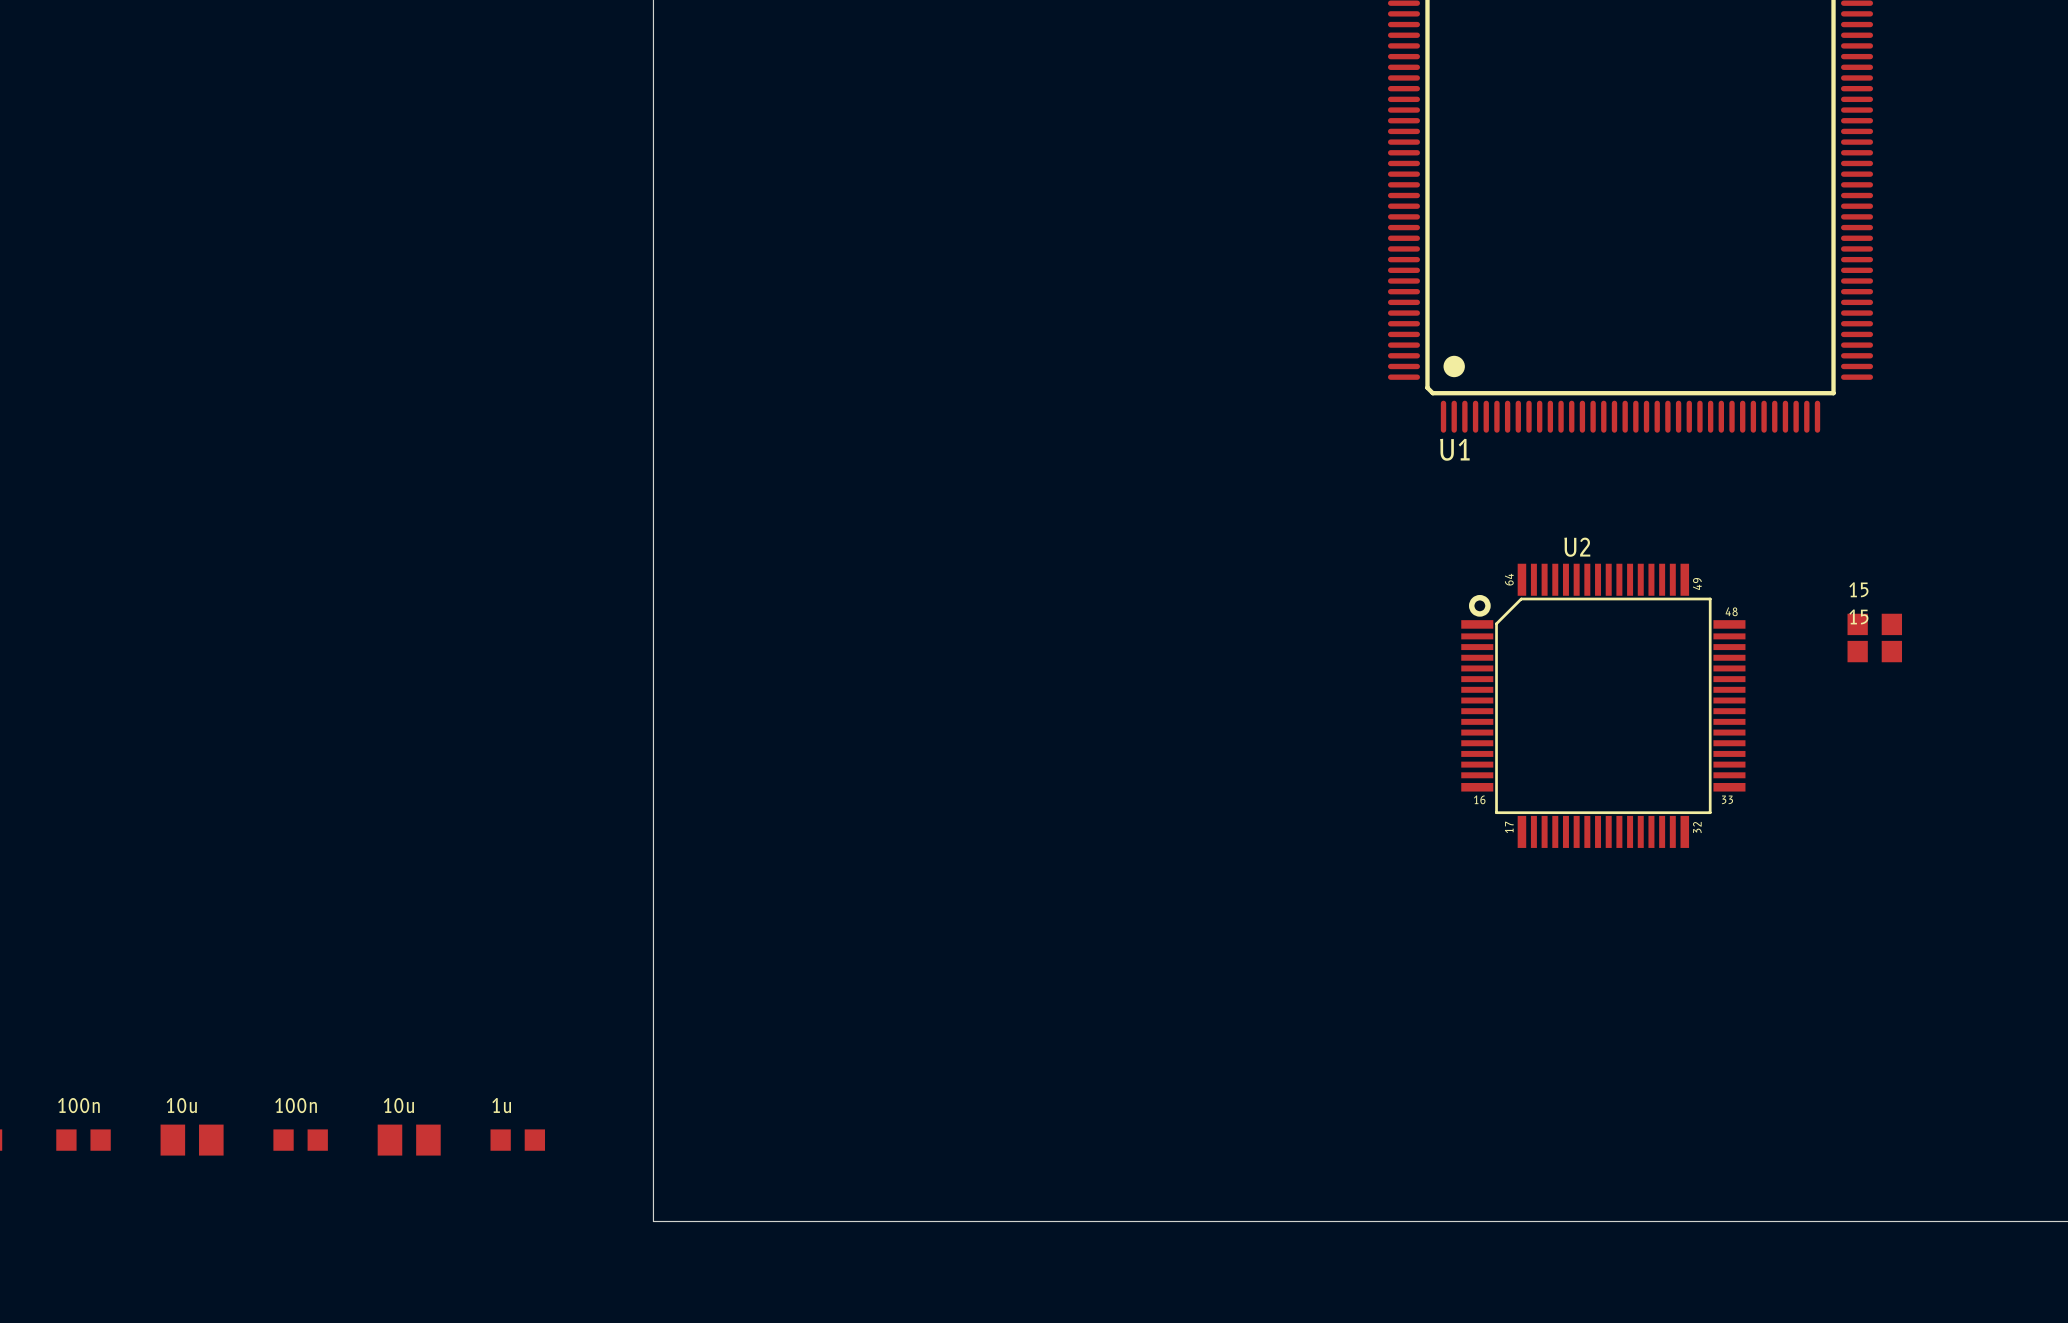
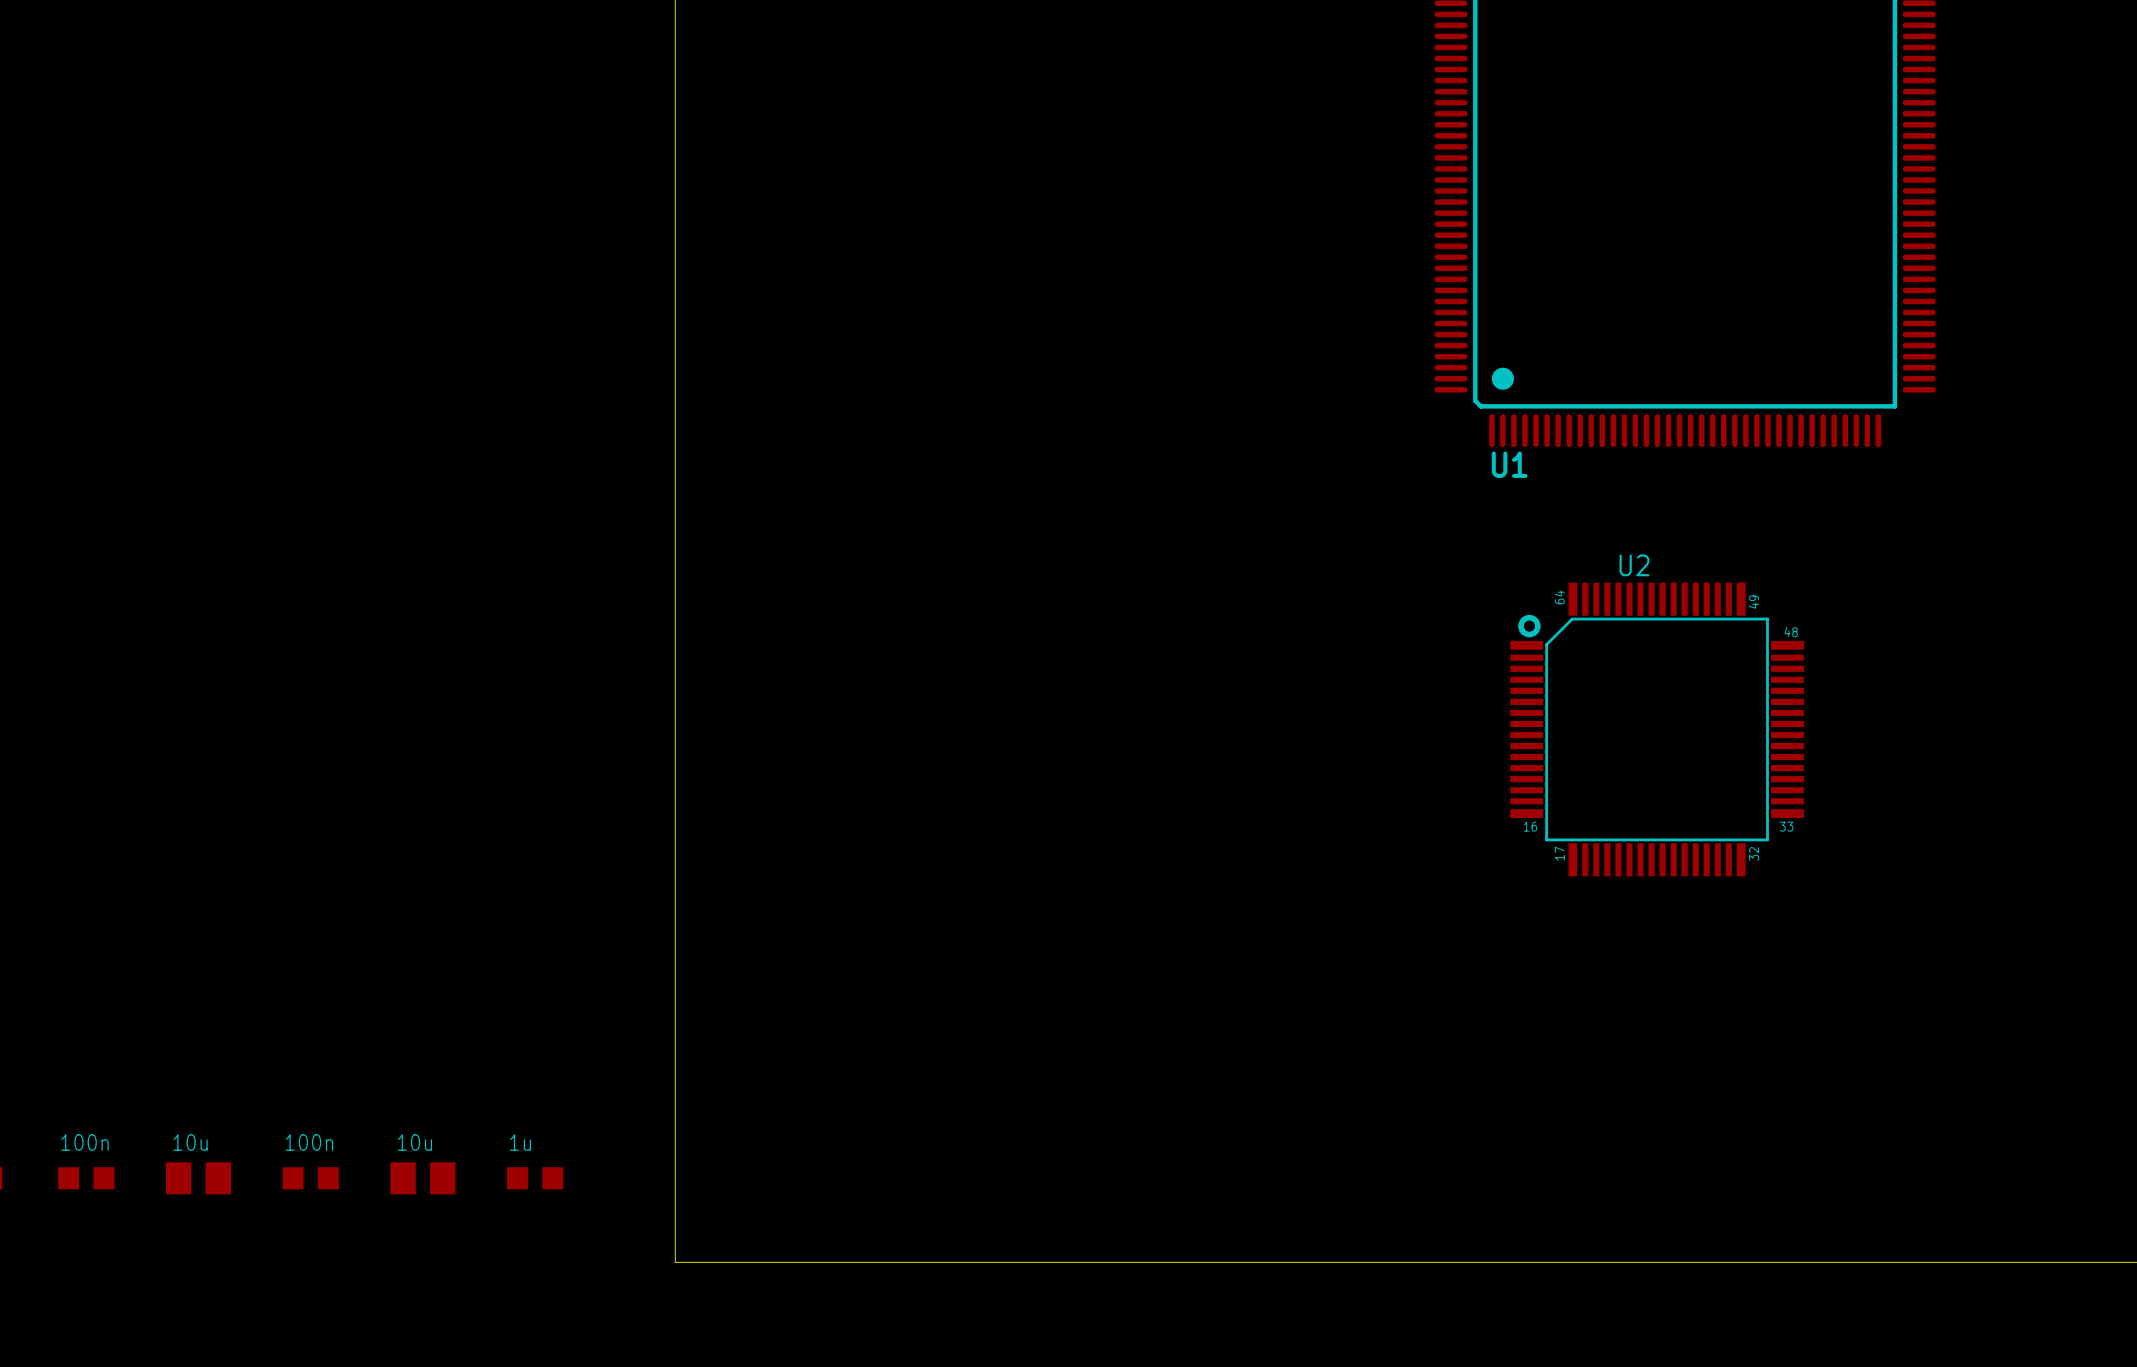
part: 15 (1874, 624) -> none
part: 15 (1874, 651) -> none

